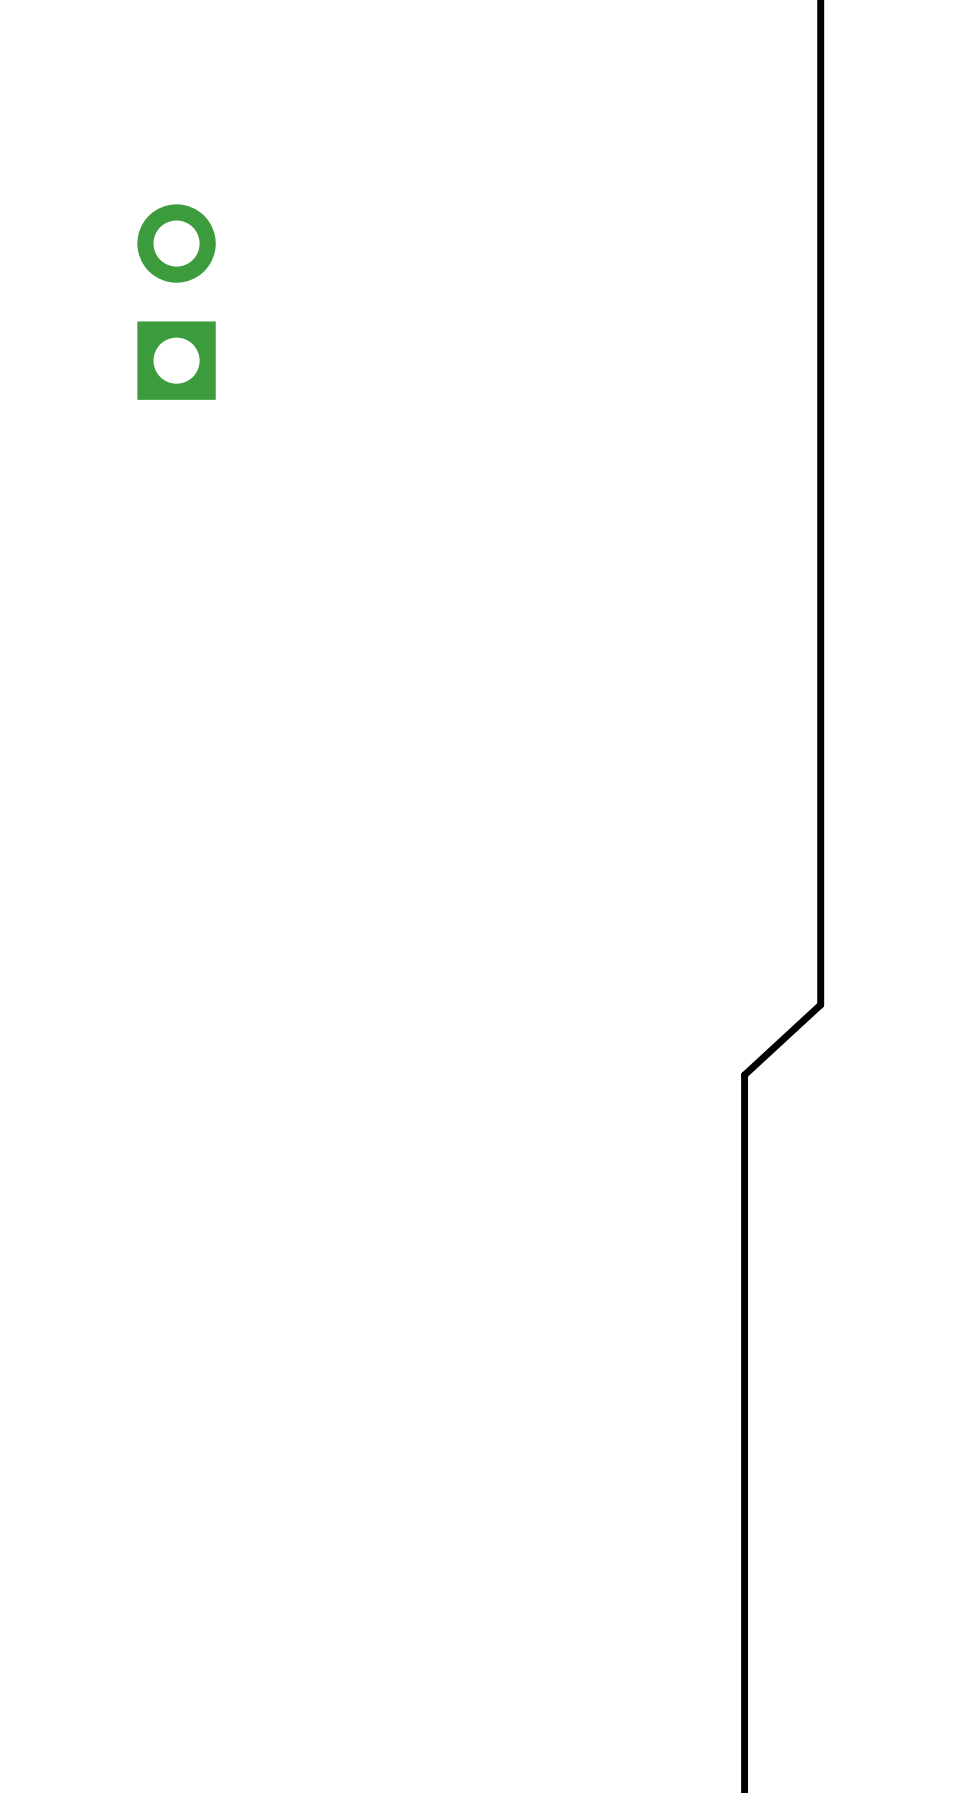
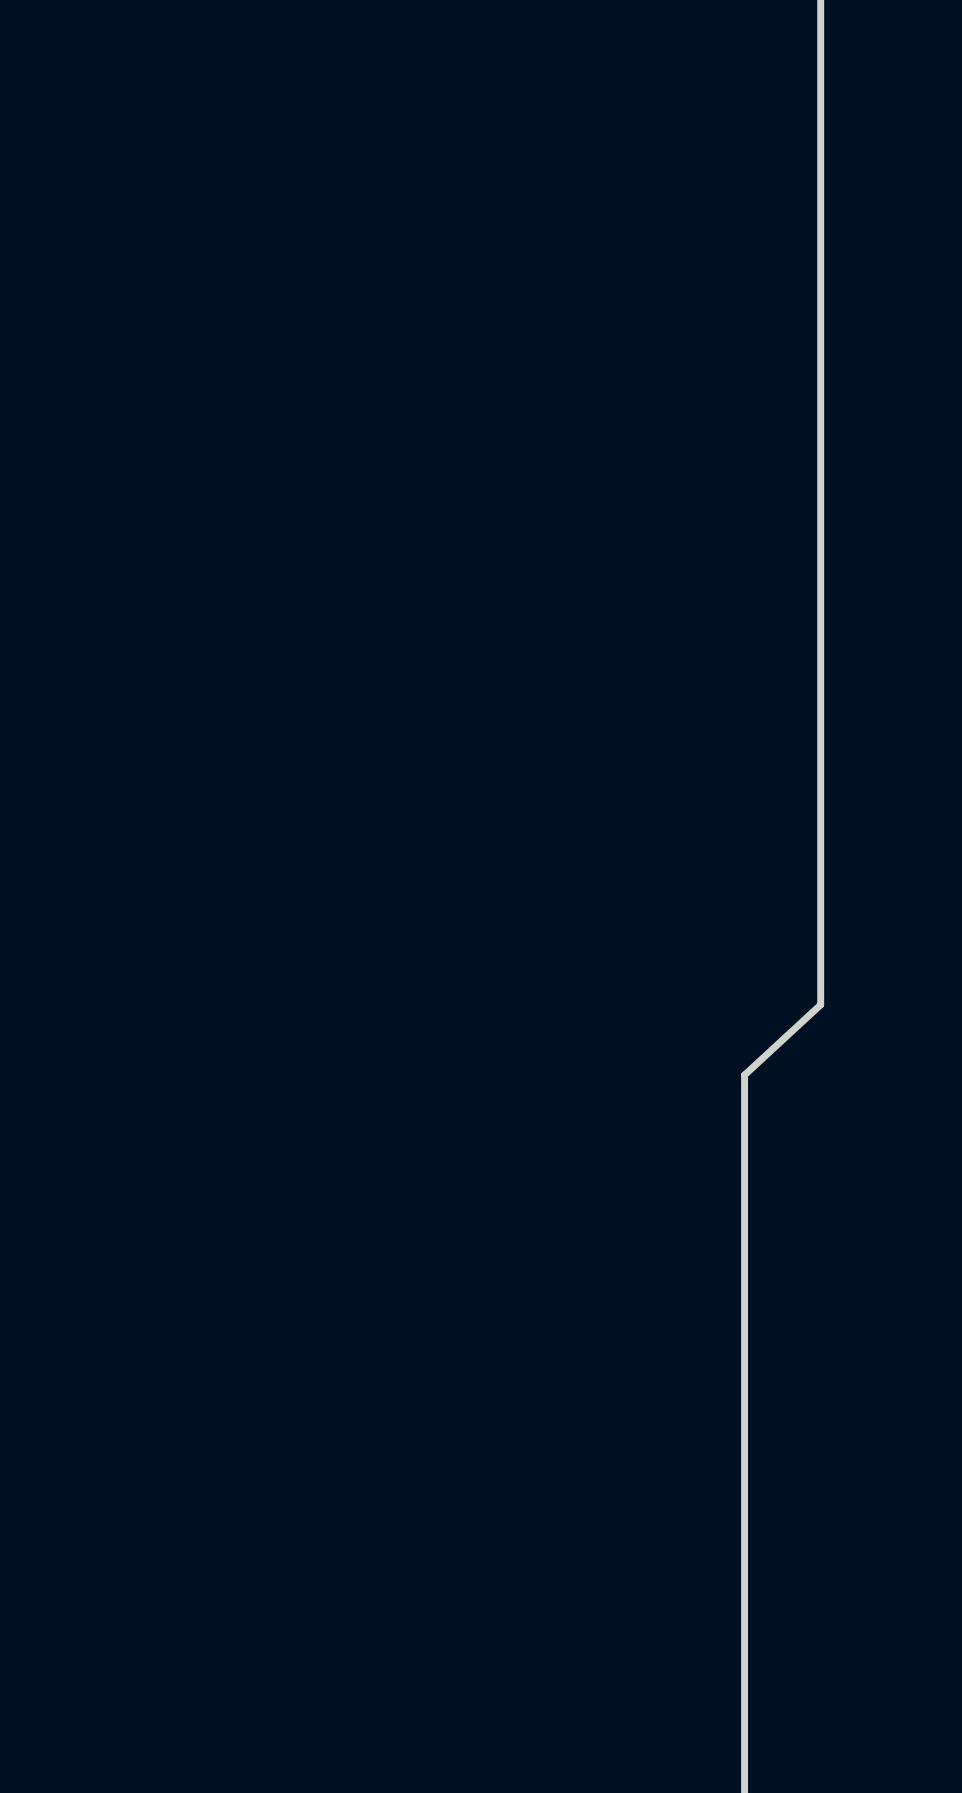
part: (176, 302) -> none

